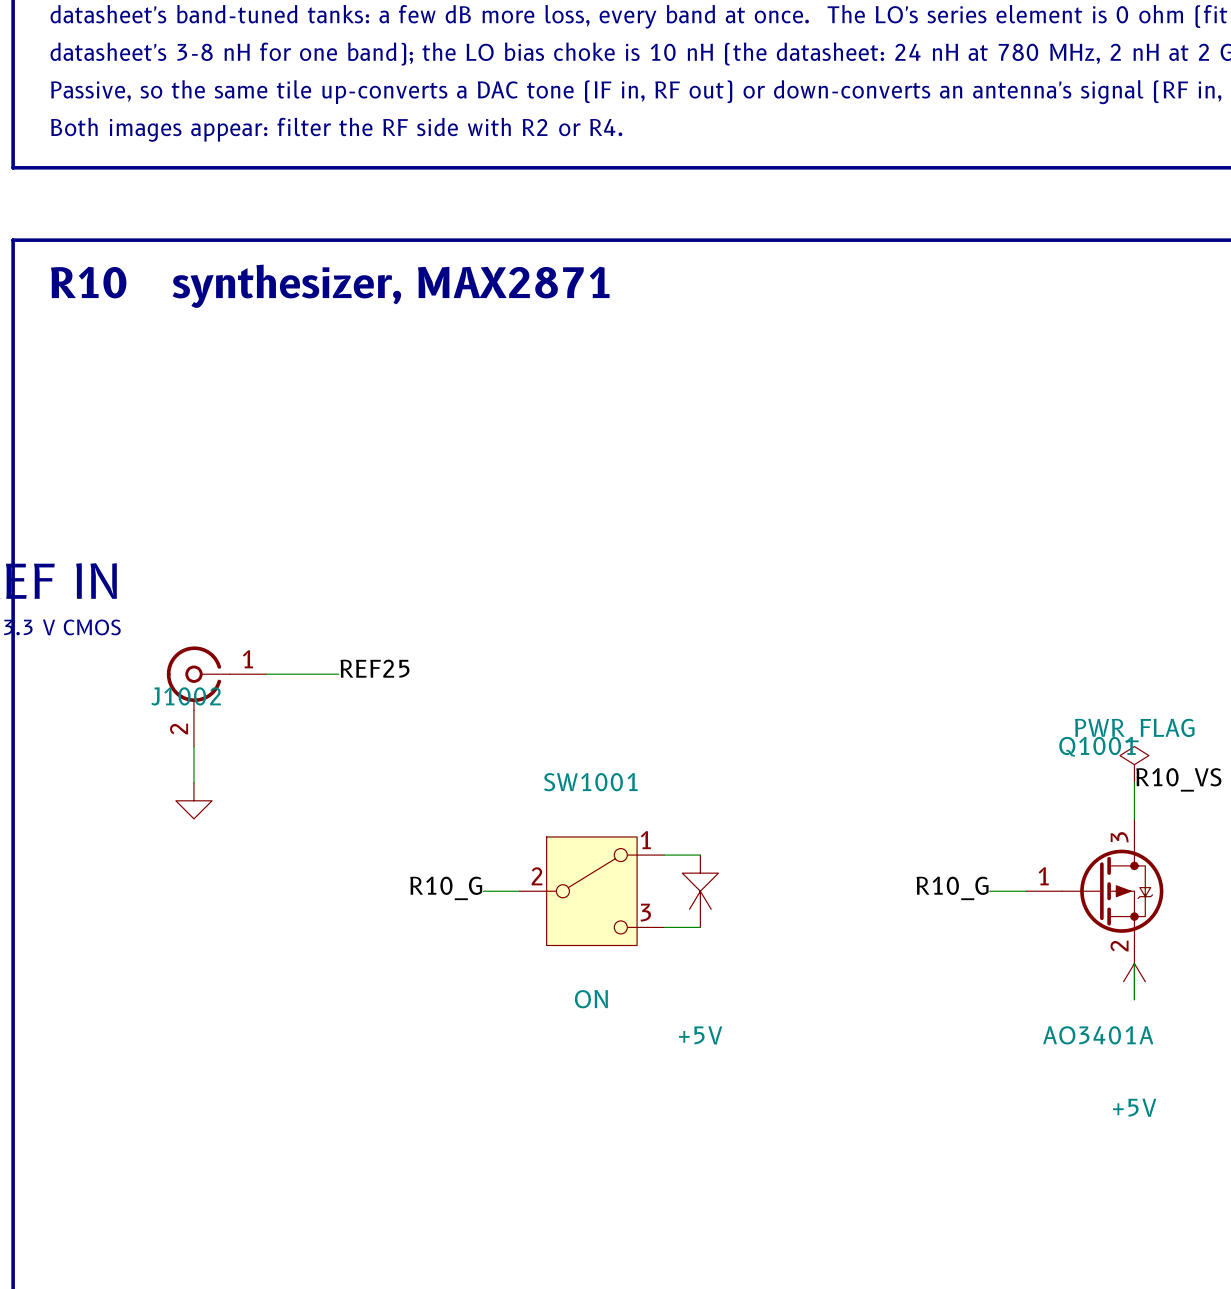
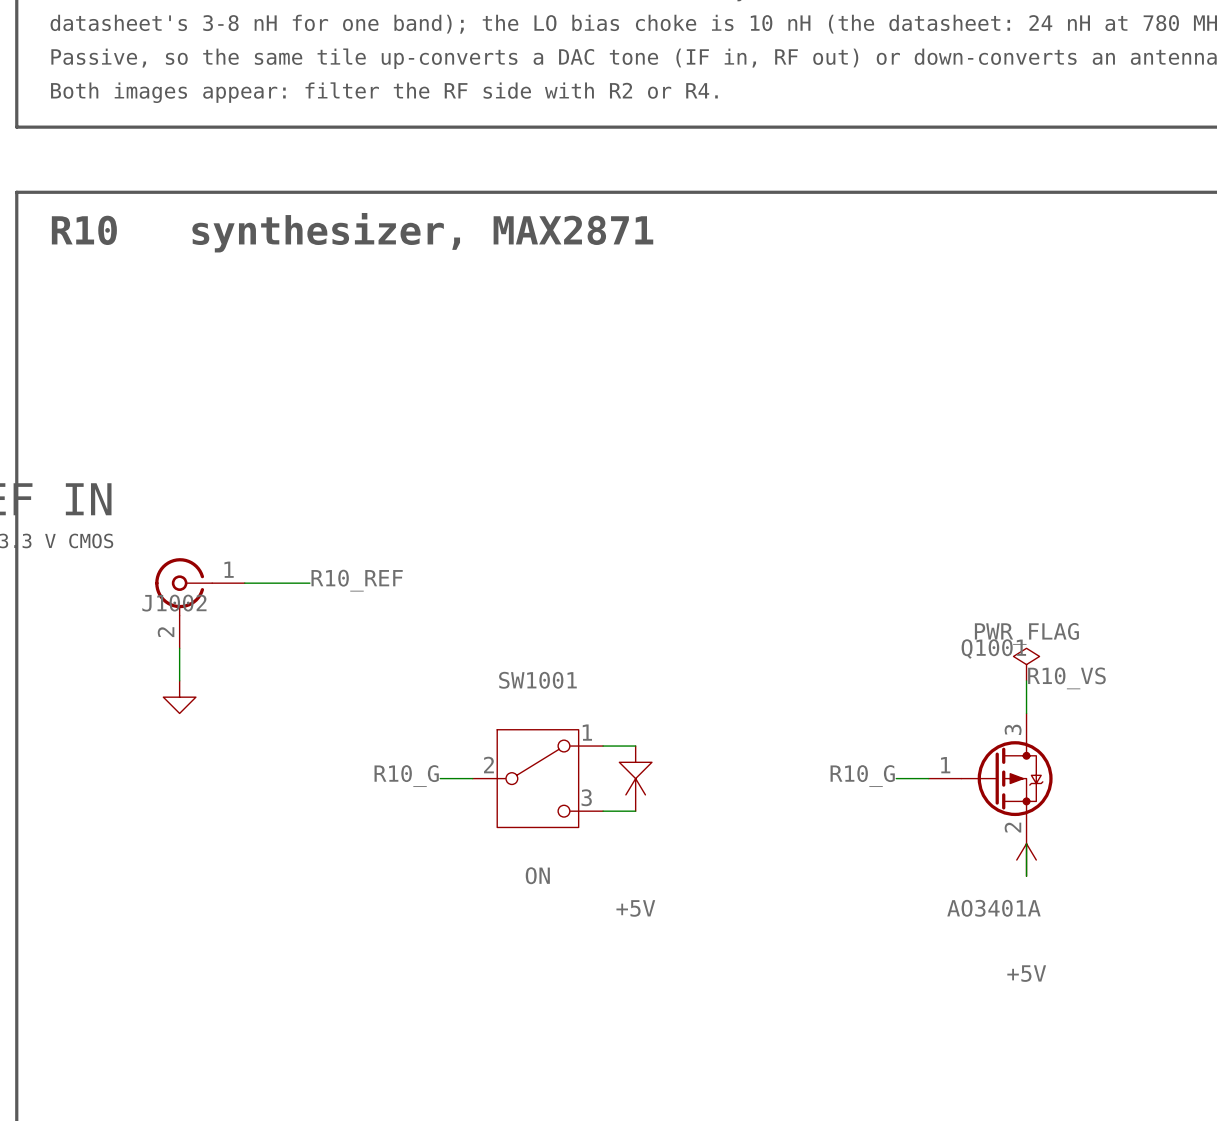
label: REF25 (374, 668) -> R10_REF (357, 580)

